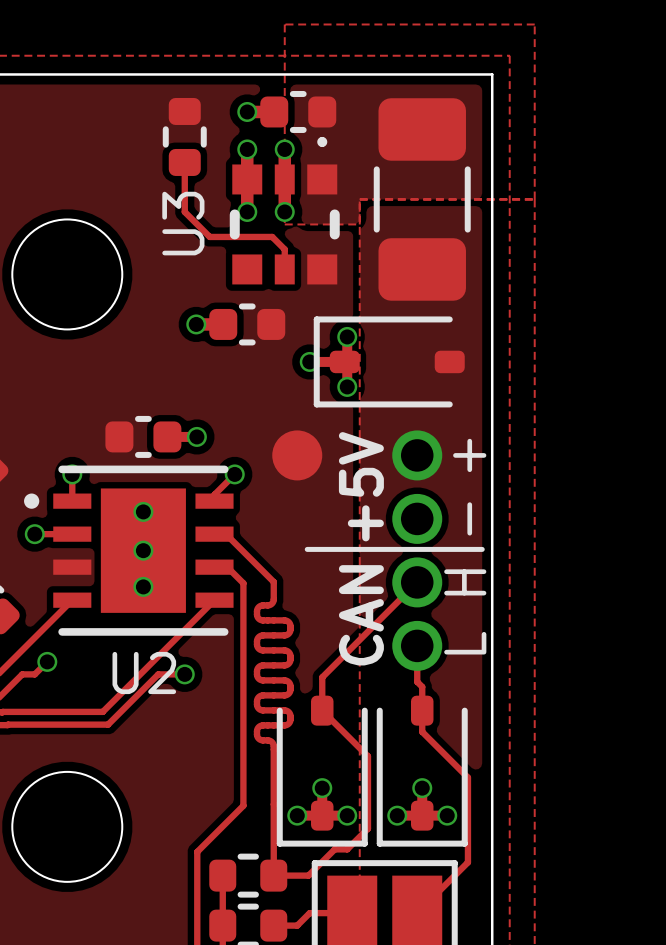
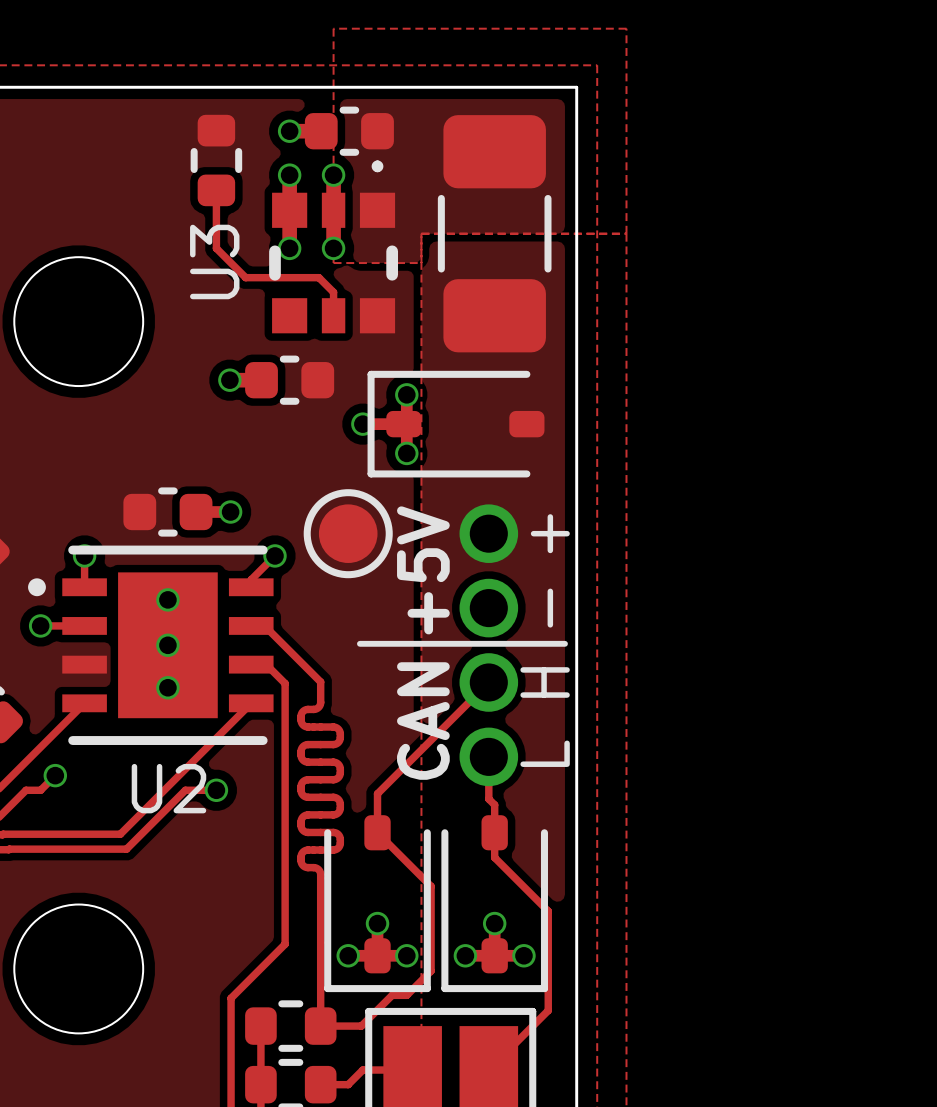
part footprint: [272, 430, 323, 481] -> [303, 489, 393, 579]

